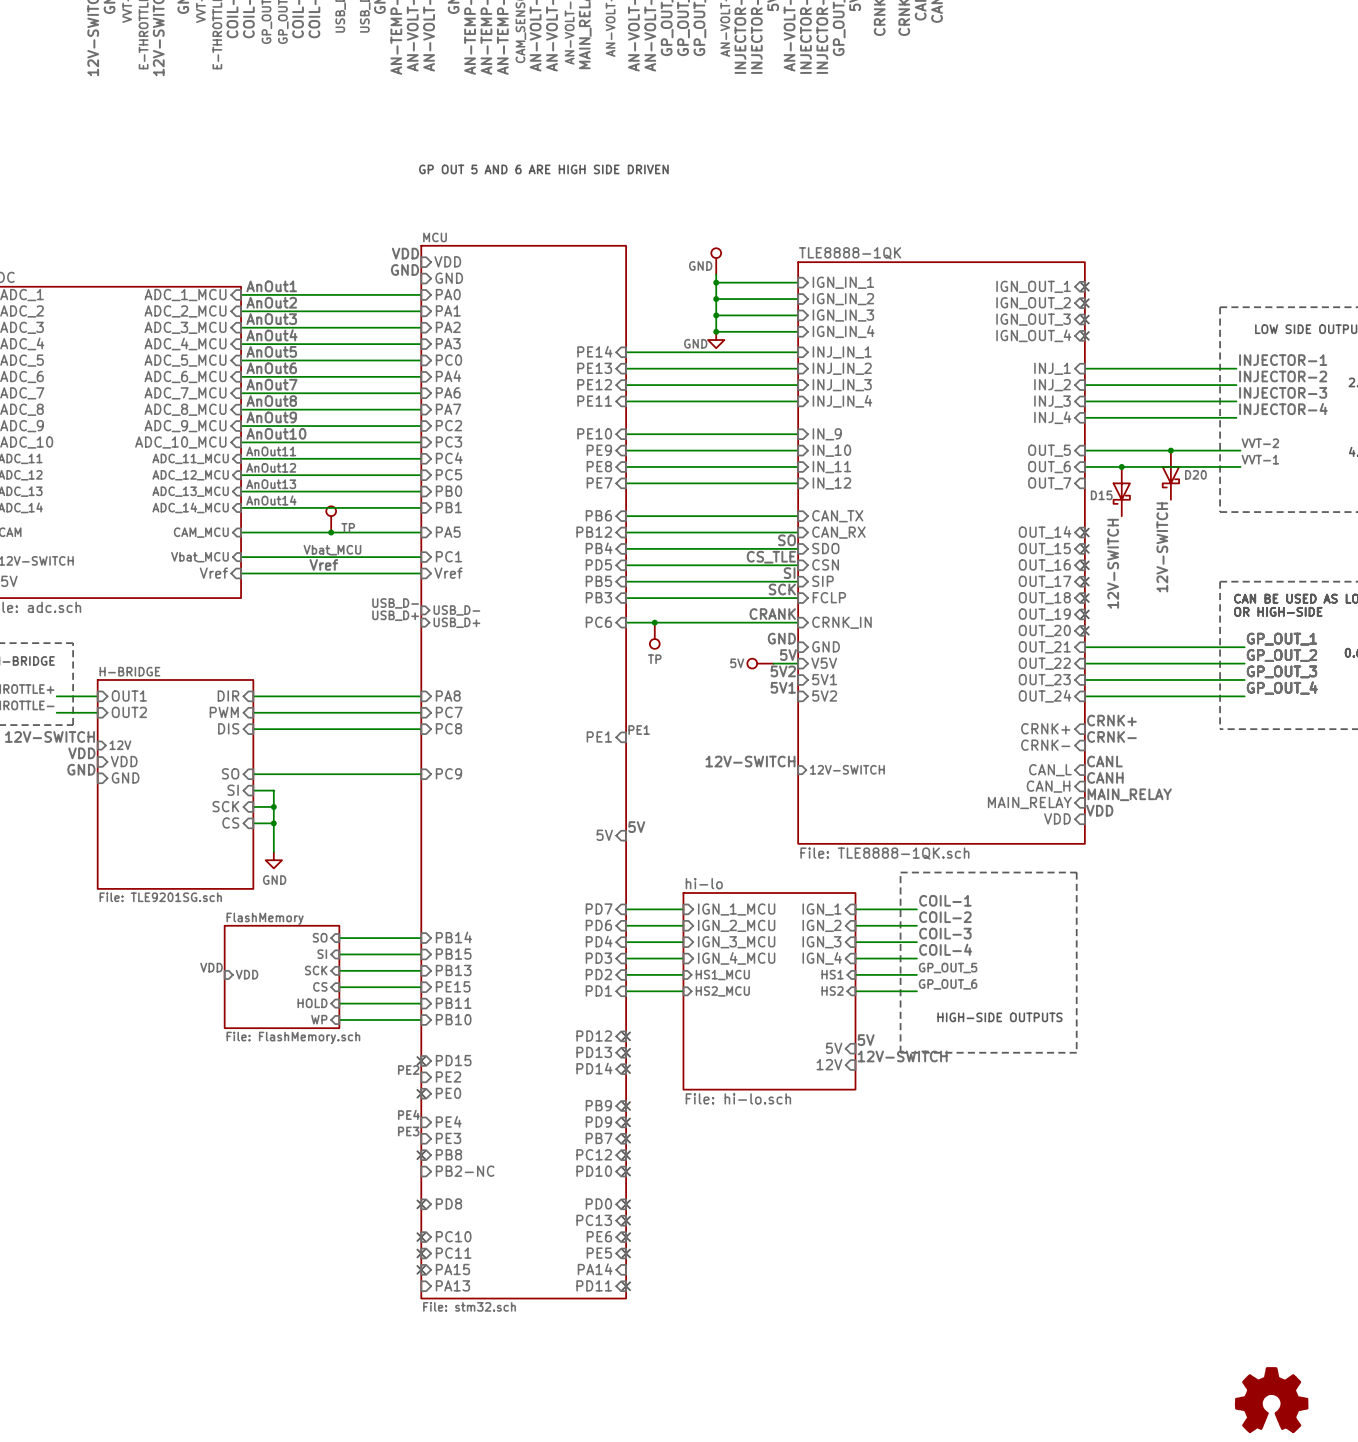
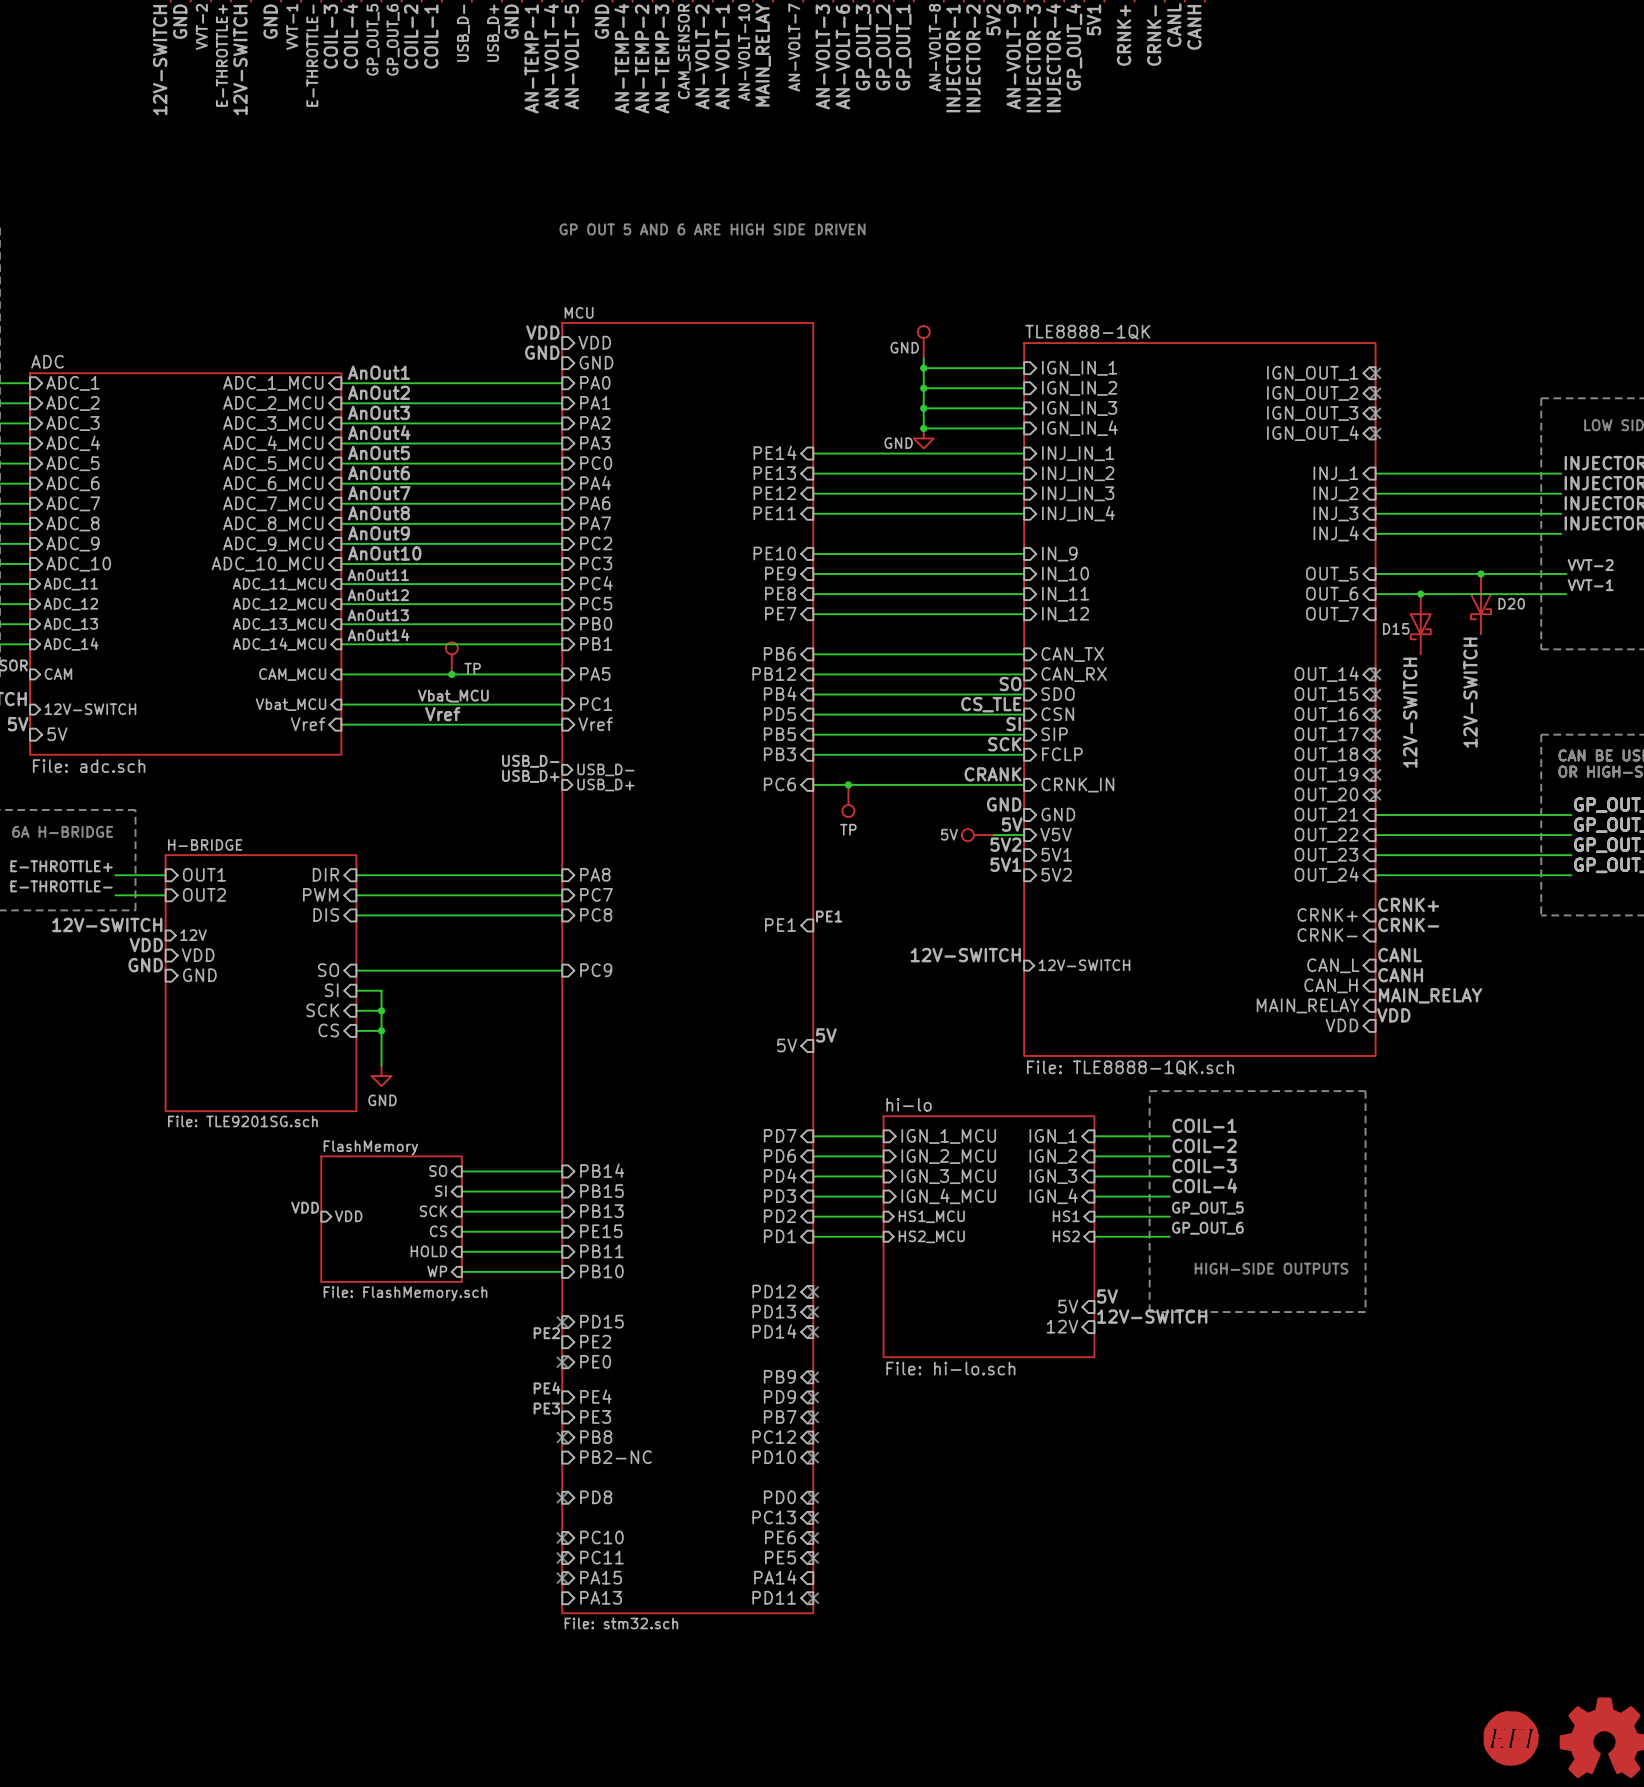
part: none -> (1511, 1738)

